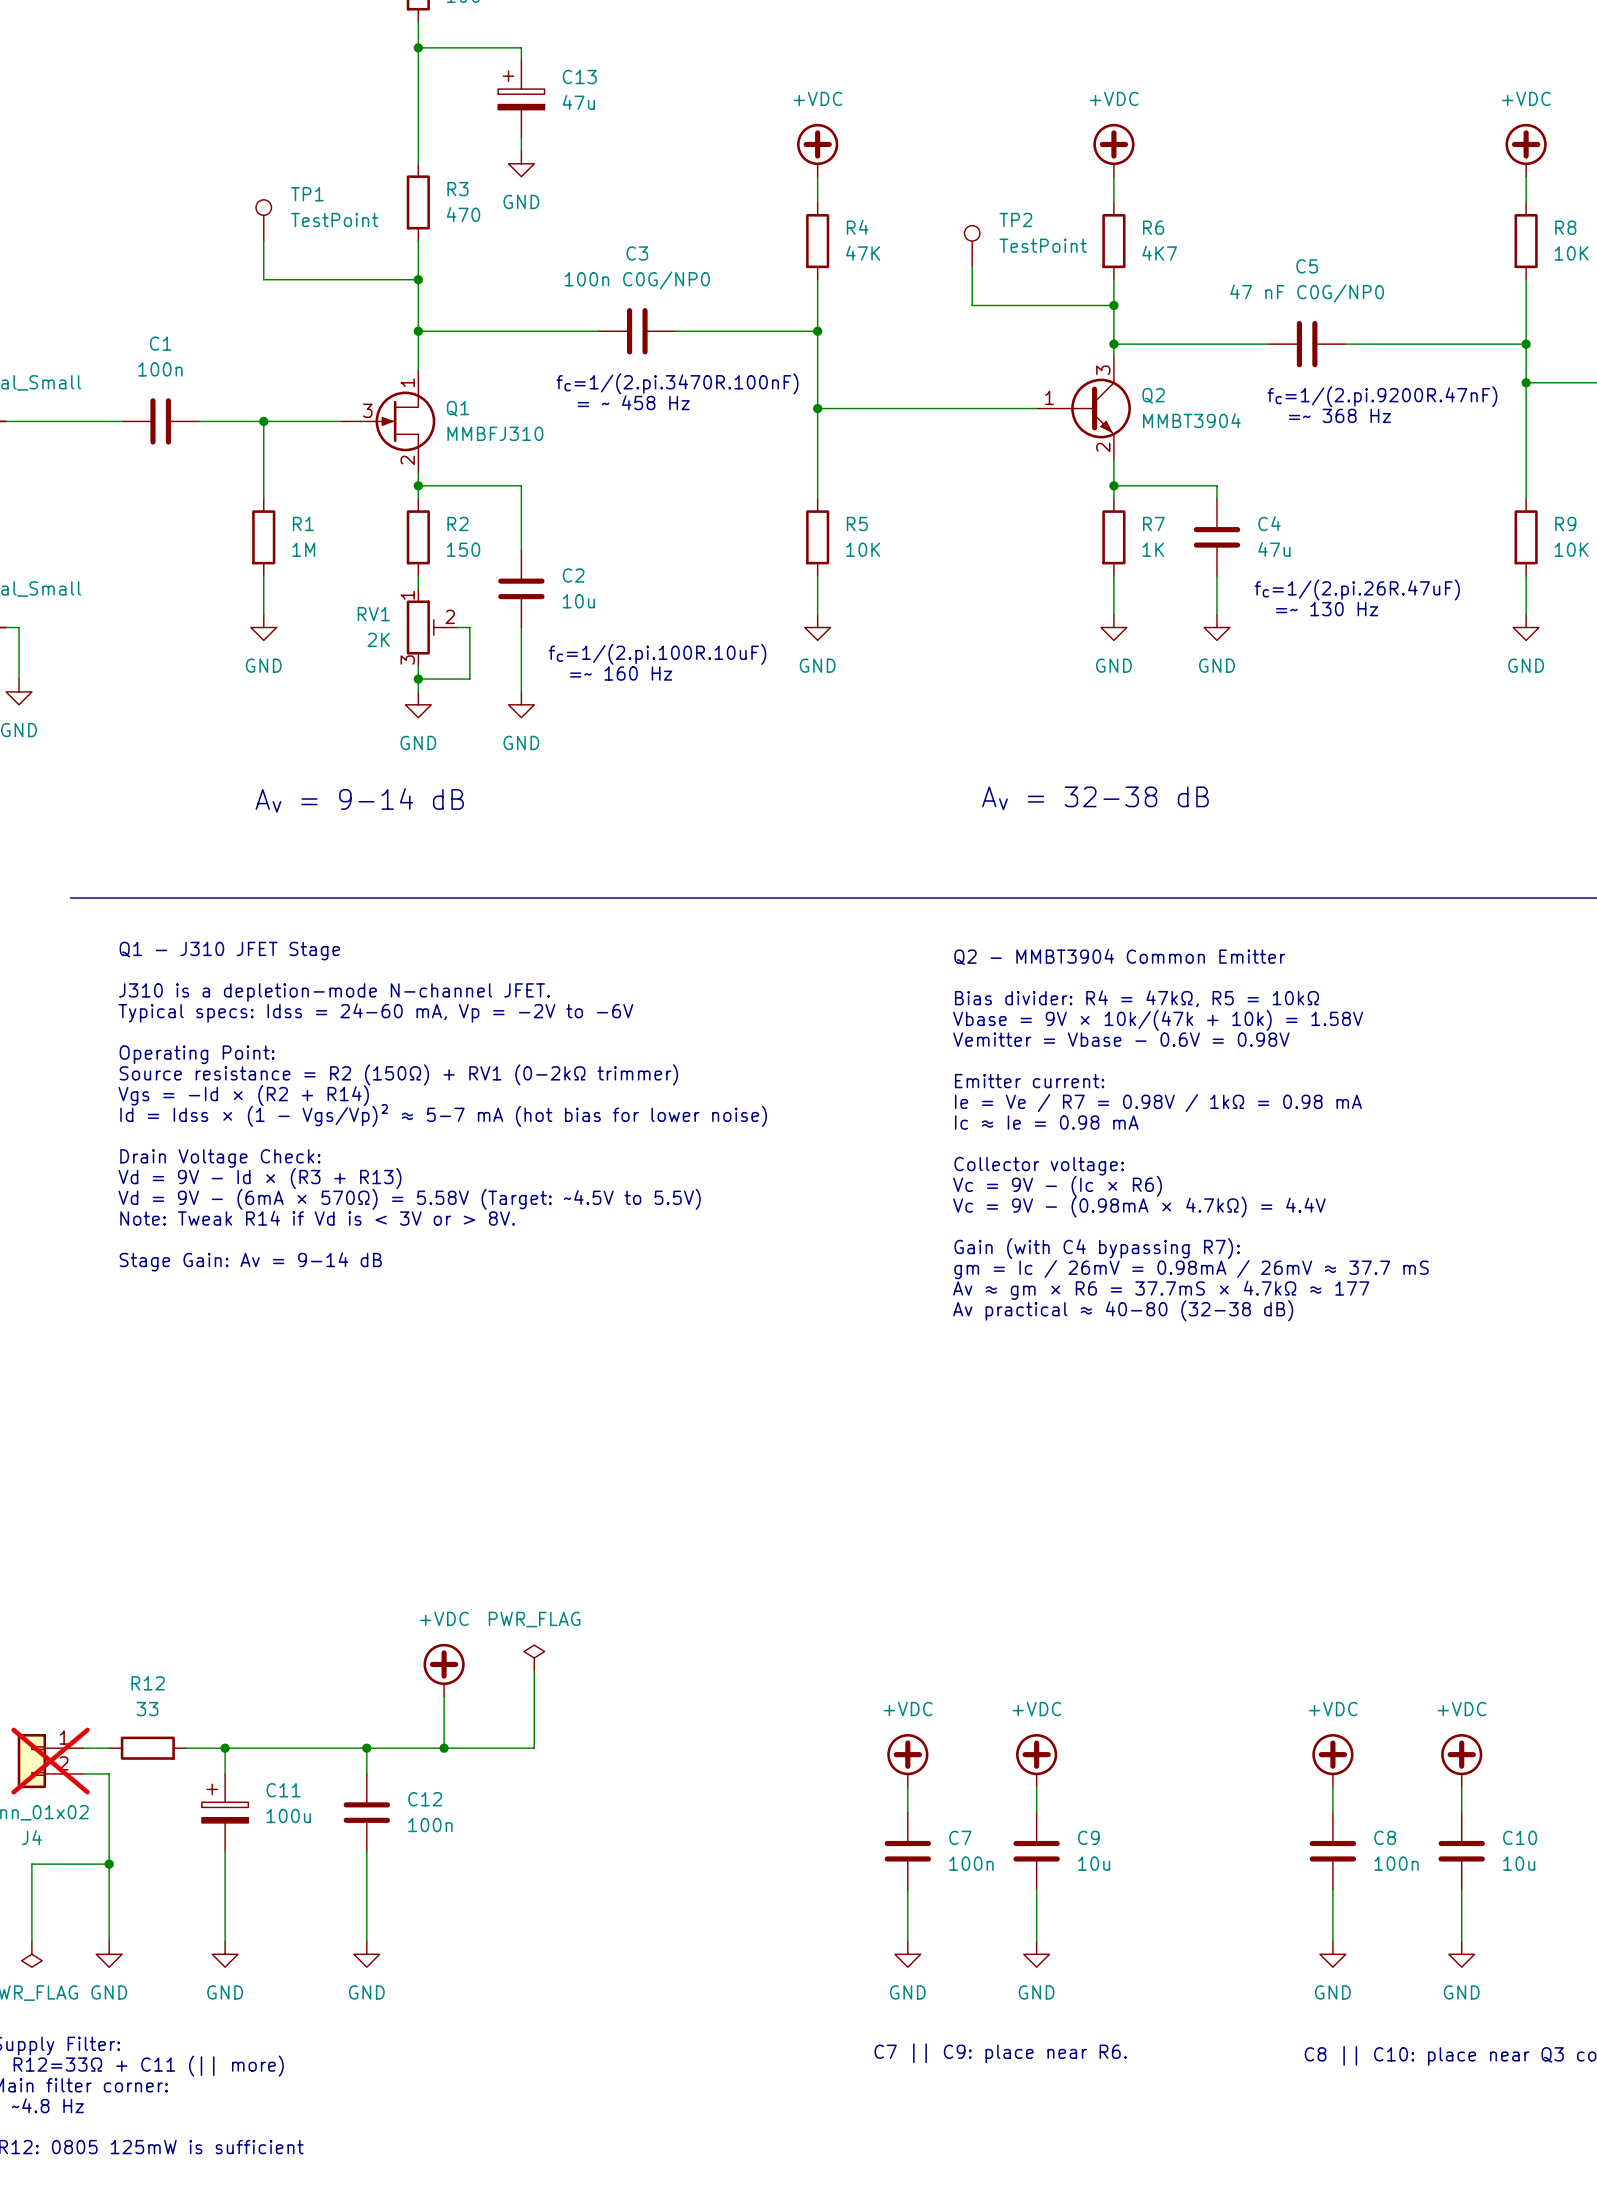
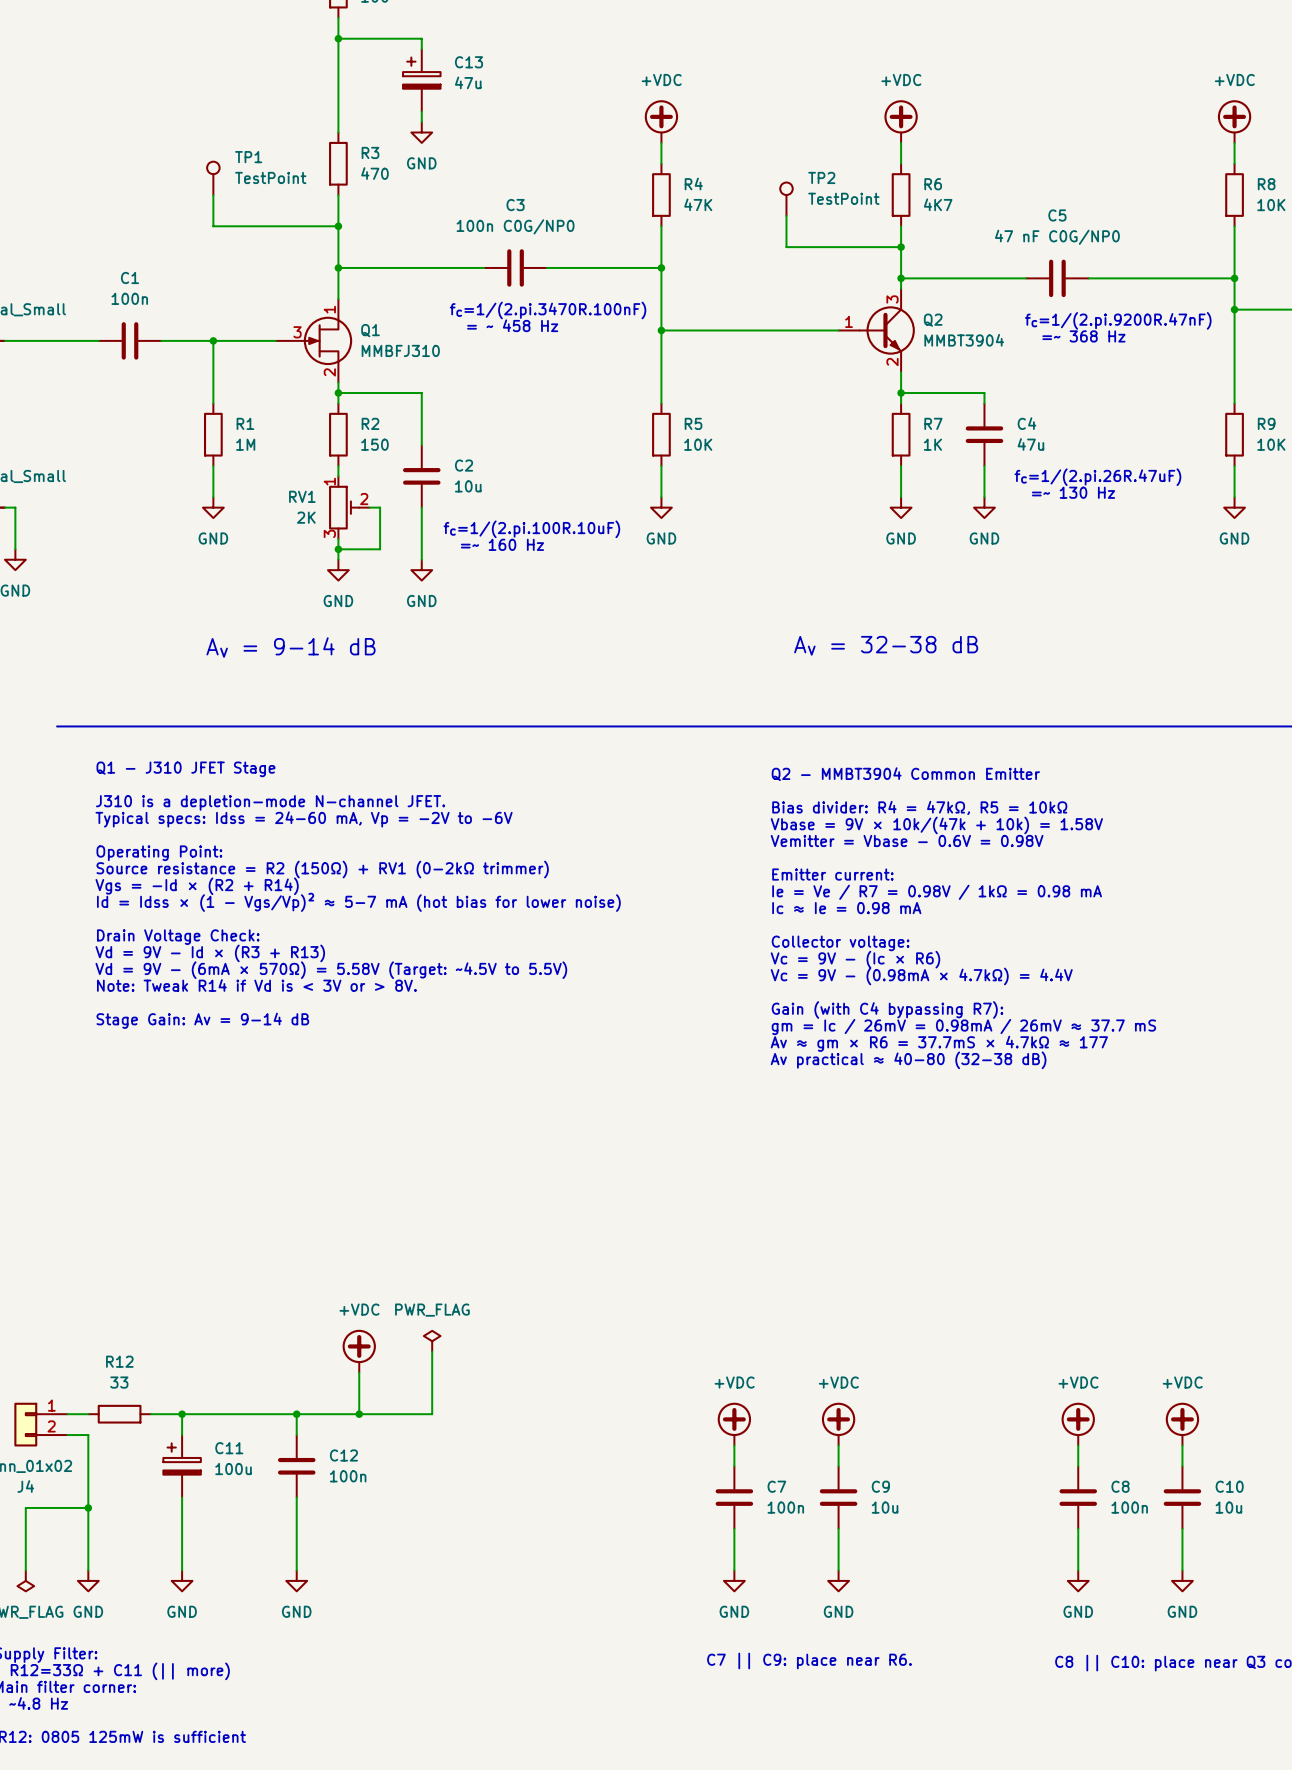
J4 do-not-place cross: (50, 1761) -> none

